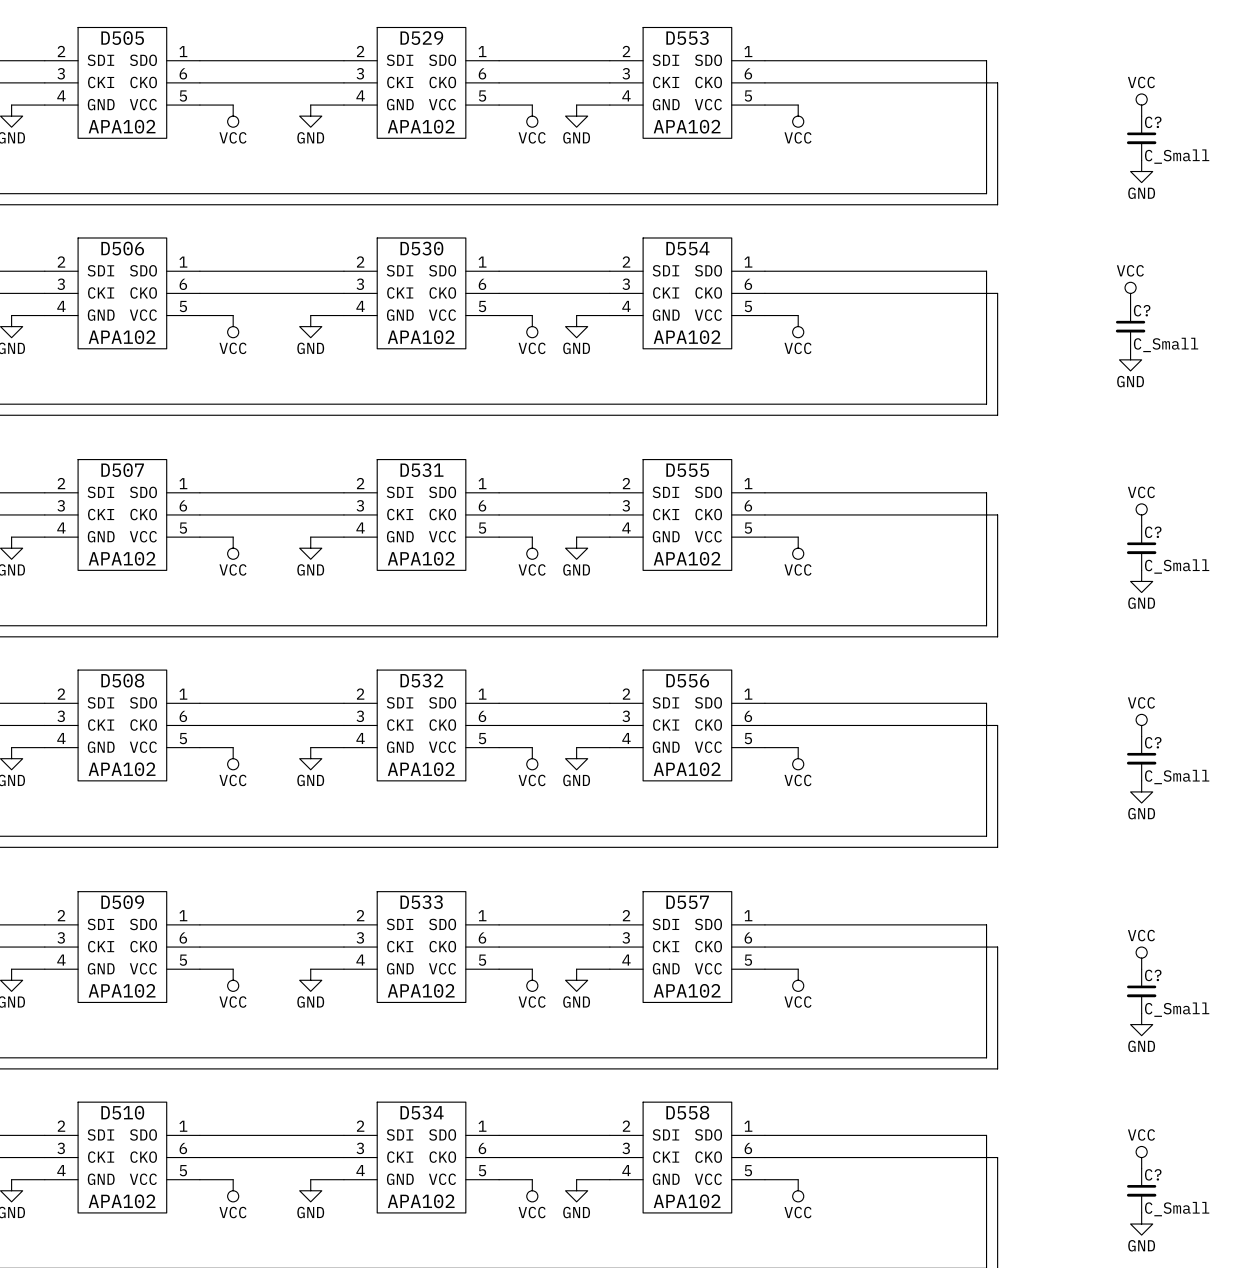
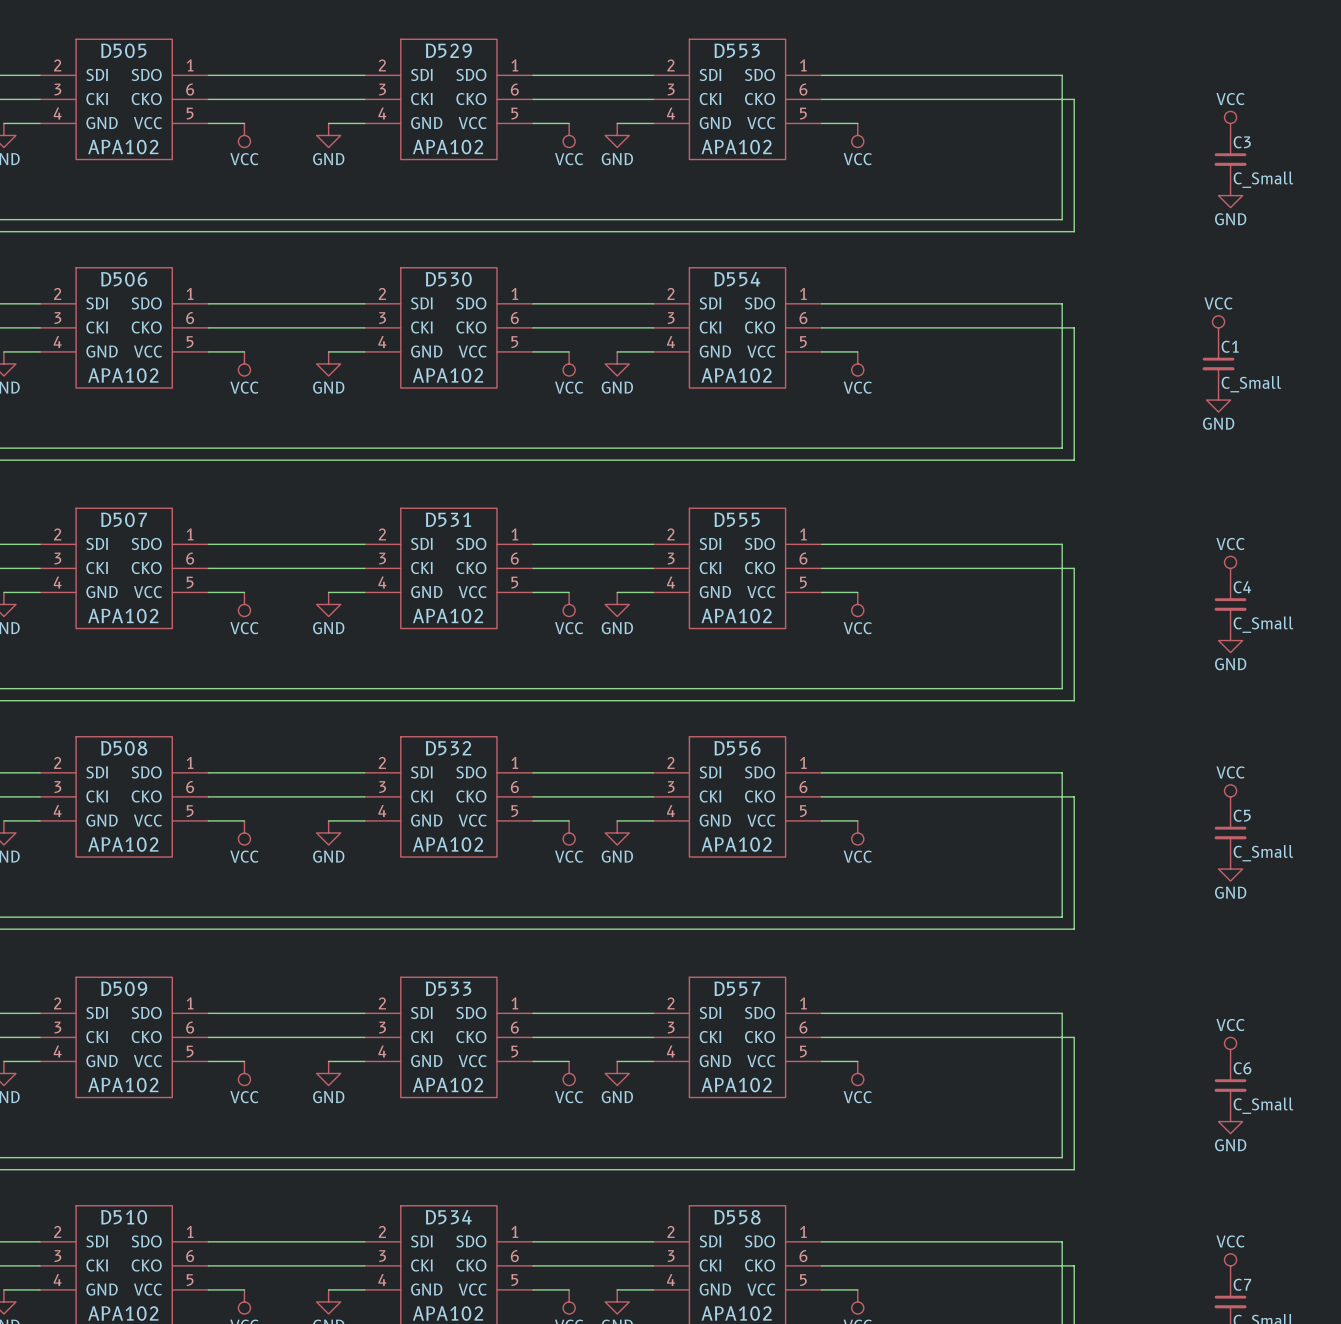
C? name: C? (1153, 122) -> C3 (1242, 142)
C? name: C? (1142, 310) -> C1 (1230, 346)
C? name: C? (1153, 532) -> C4 (1242, 587)
C? name: C? (1153, 742) -> C5 (1242, 815)
C? name: C? (1153, 975) -> C6 (1242, 1068)
C? name: C? (1153, 1174) -> C7 (1242, 1284)

